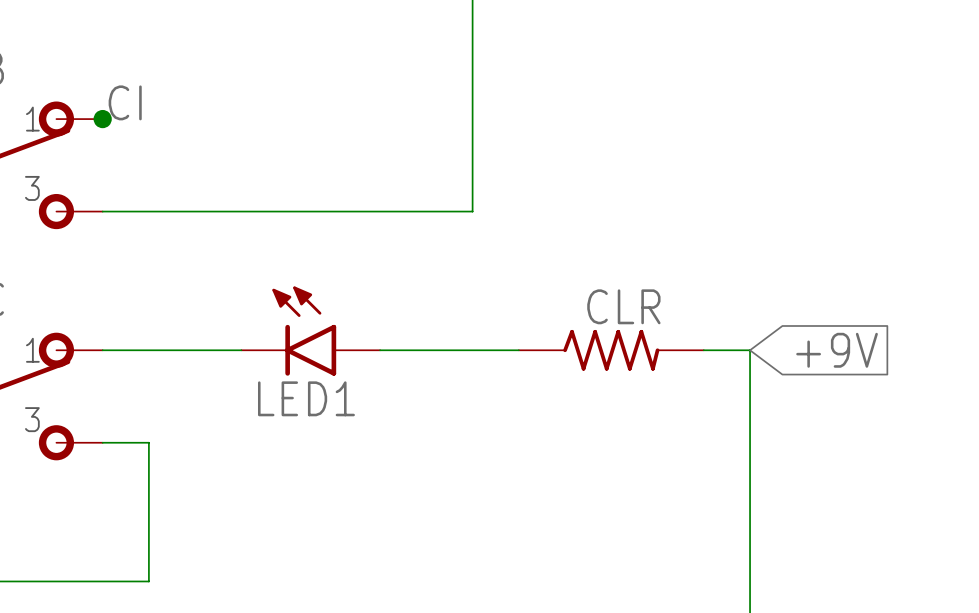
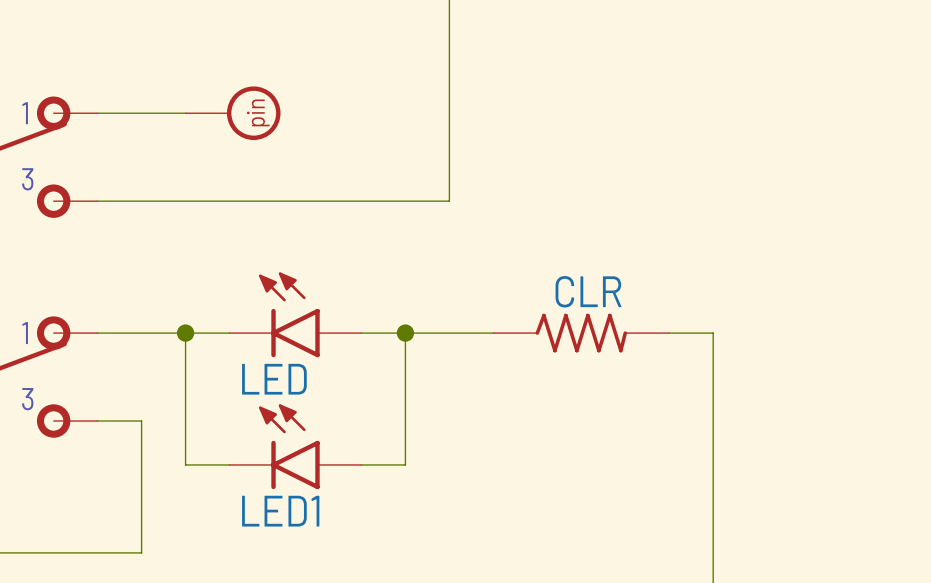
label: CI (125, 102) -> none
wire: none -> (97, 113) (185, 113)
junction: (102, 119) -> none
part: none -> (233, 113)
wire: none -> (185, 333) (185, 464) (229, 464)
junction: none -> (185, 333)
wire: none -> (405, 333) (405, 464) (361, 464)
junction: none -> (405, 333)
global label: +9V (837, 350) -> none
LED1 name: LED1 (306, 398) -> LED (274, 379)
LED1: none -> (295, 446)

